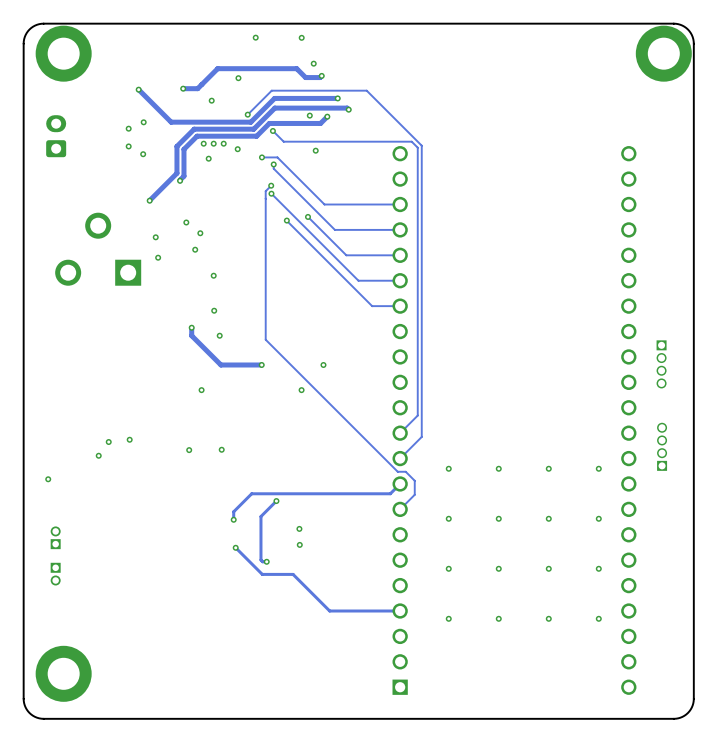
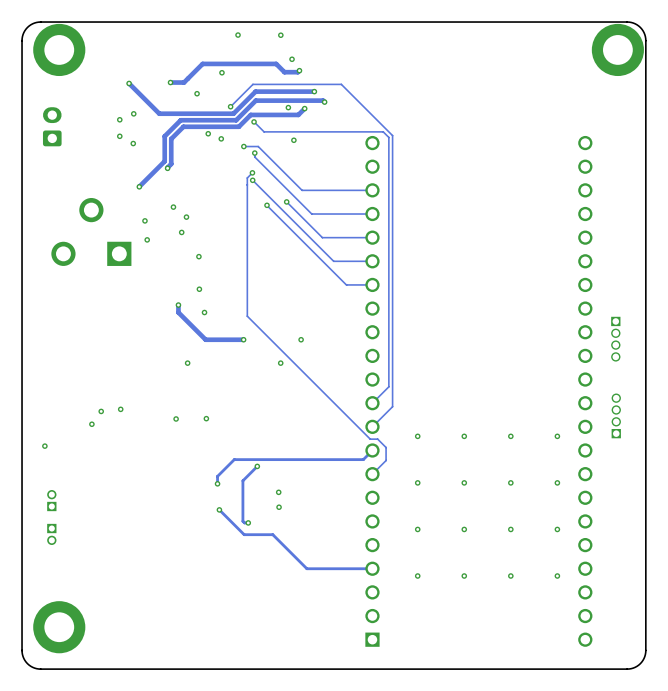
via: (203, 143) -> none
via: (213, 143) -> none
via: (208, 158) -> none

